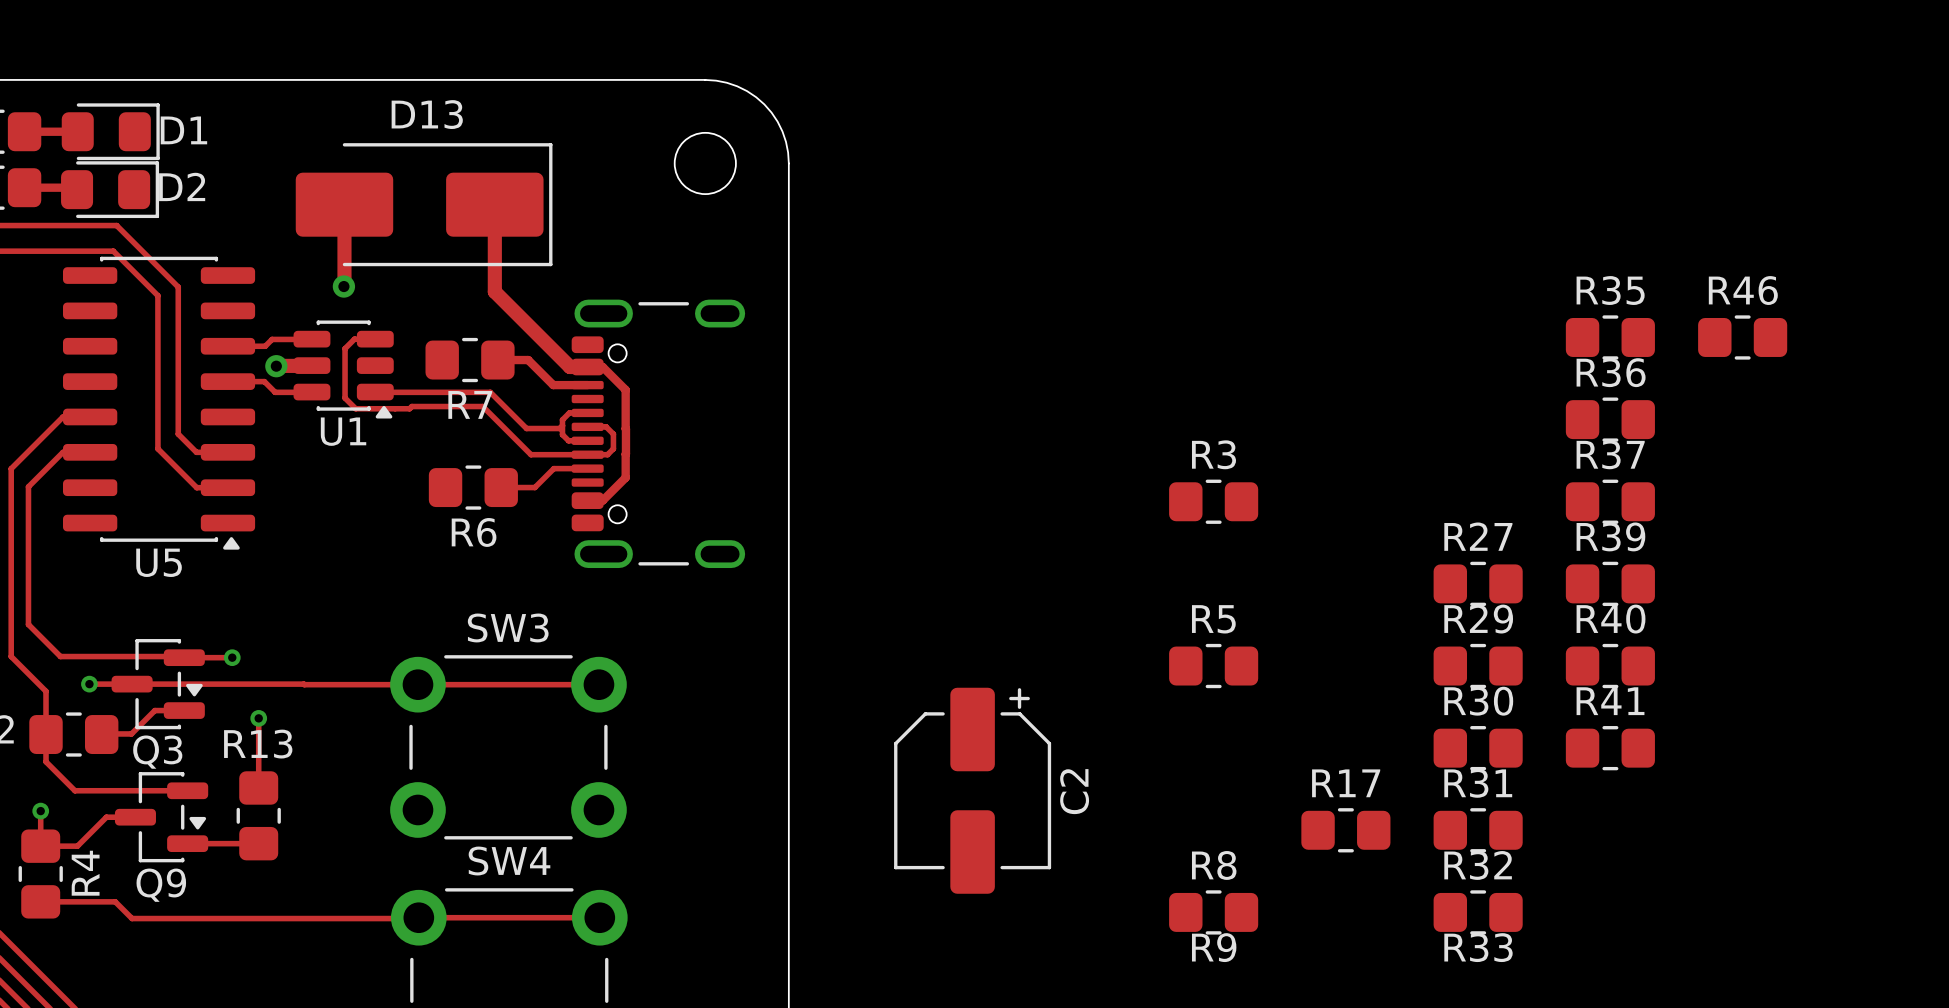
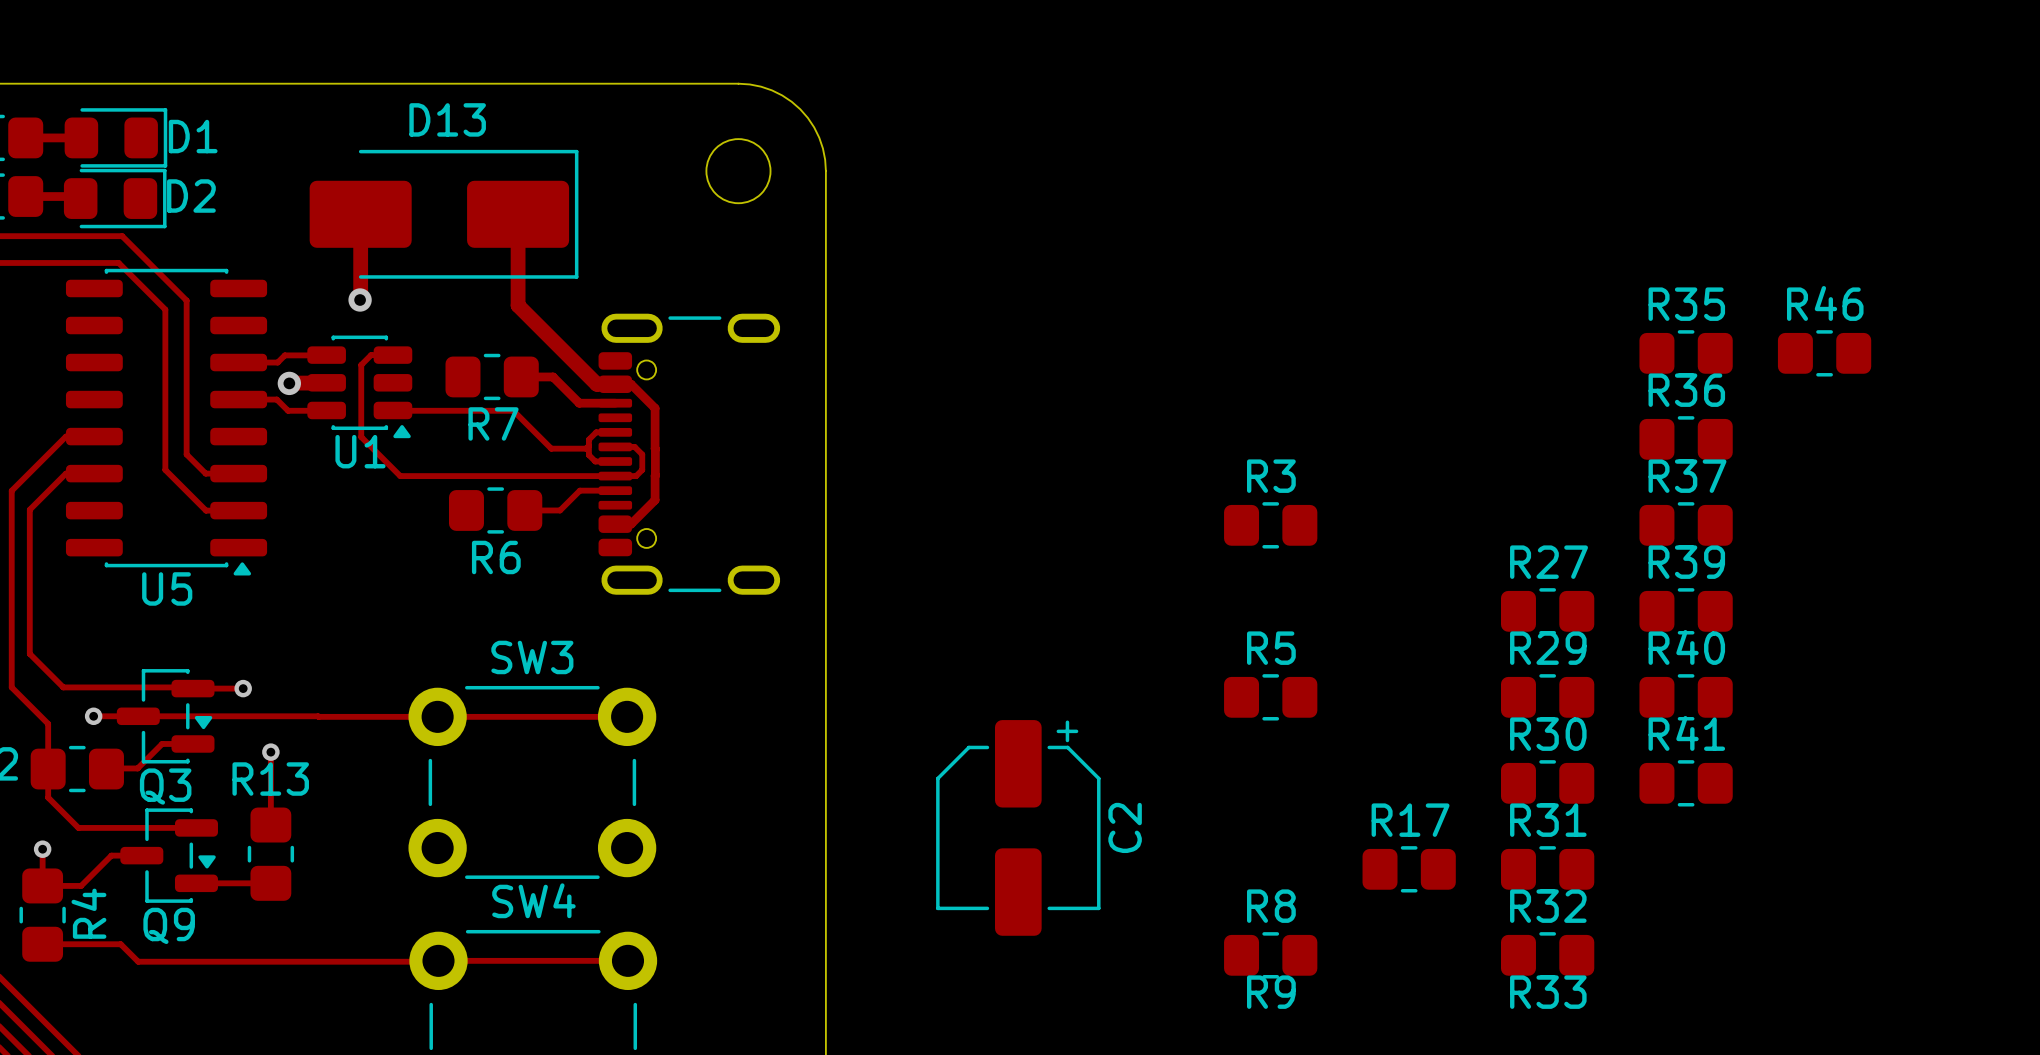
track: (345, 398) (355, 408) (394, 408) -> none
track: (395, 408) (409, 408) (411, 406) (482, 406) (531, 454) -> (361, 416) (361, 437) (400, 476) (555, 476)

